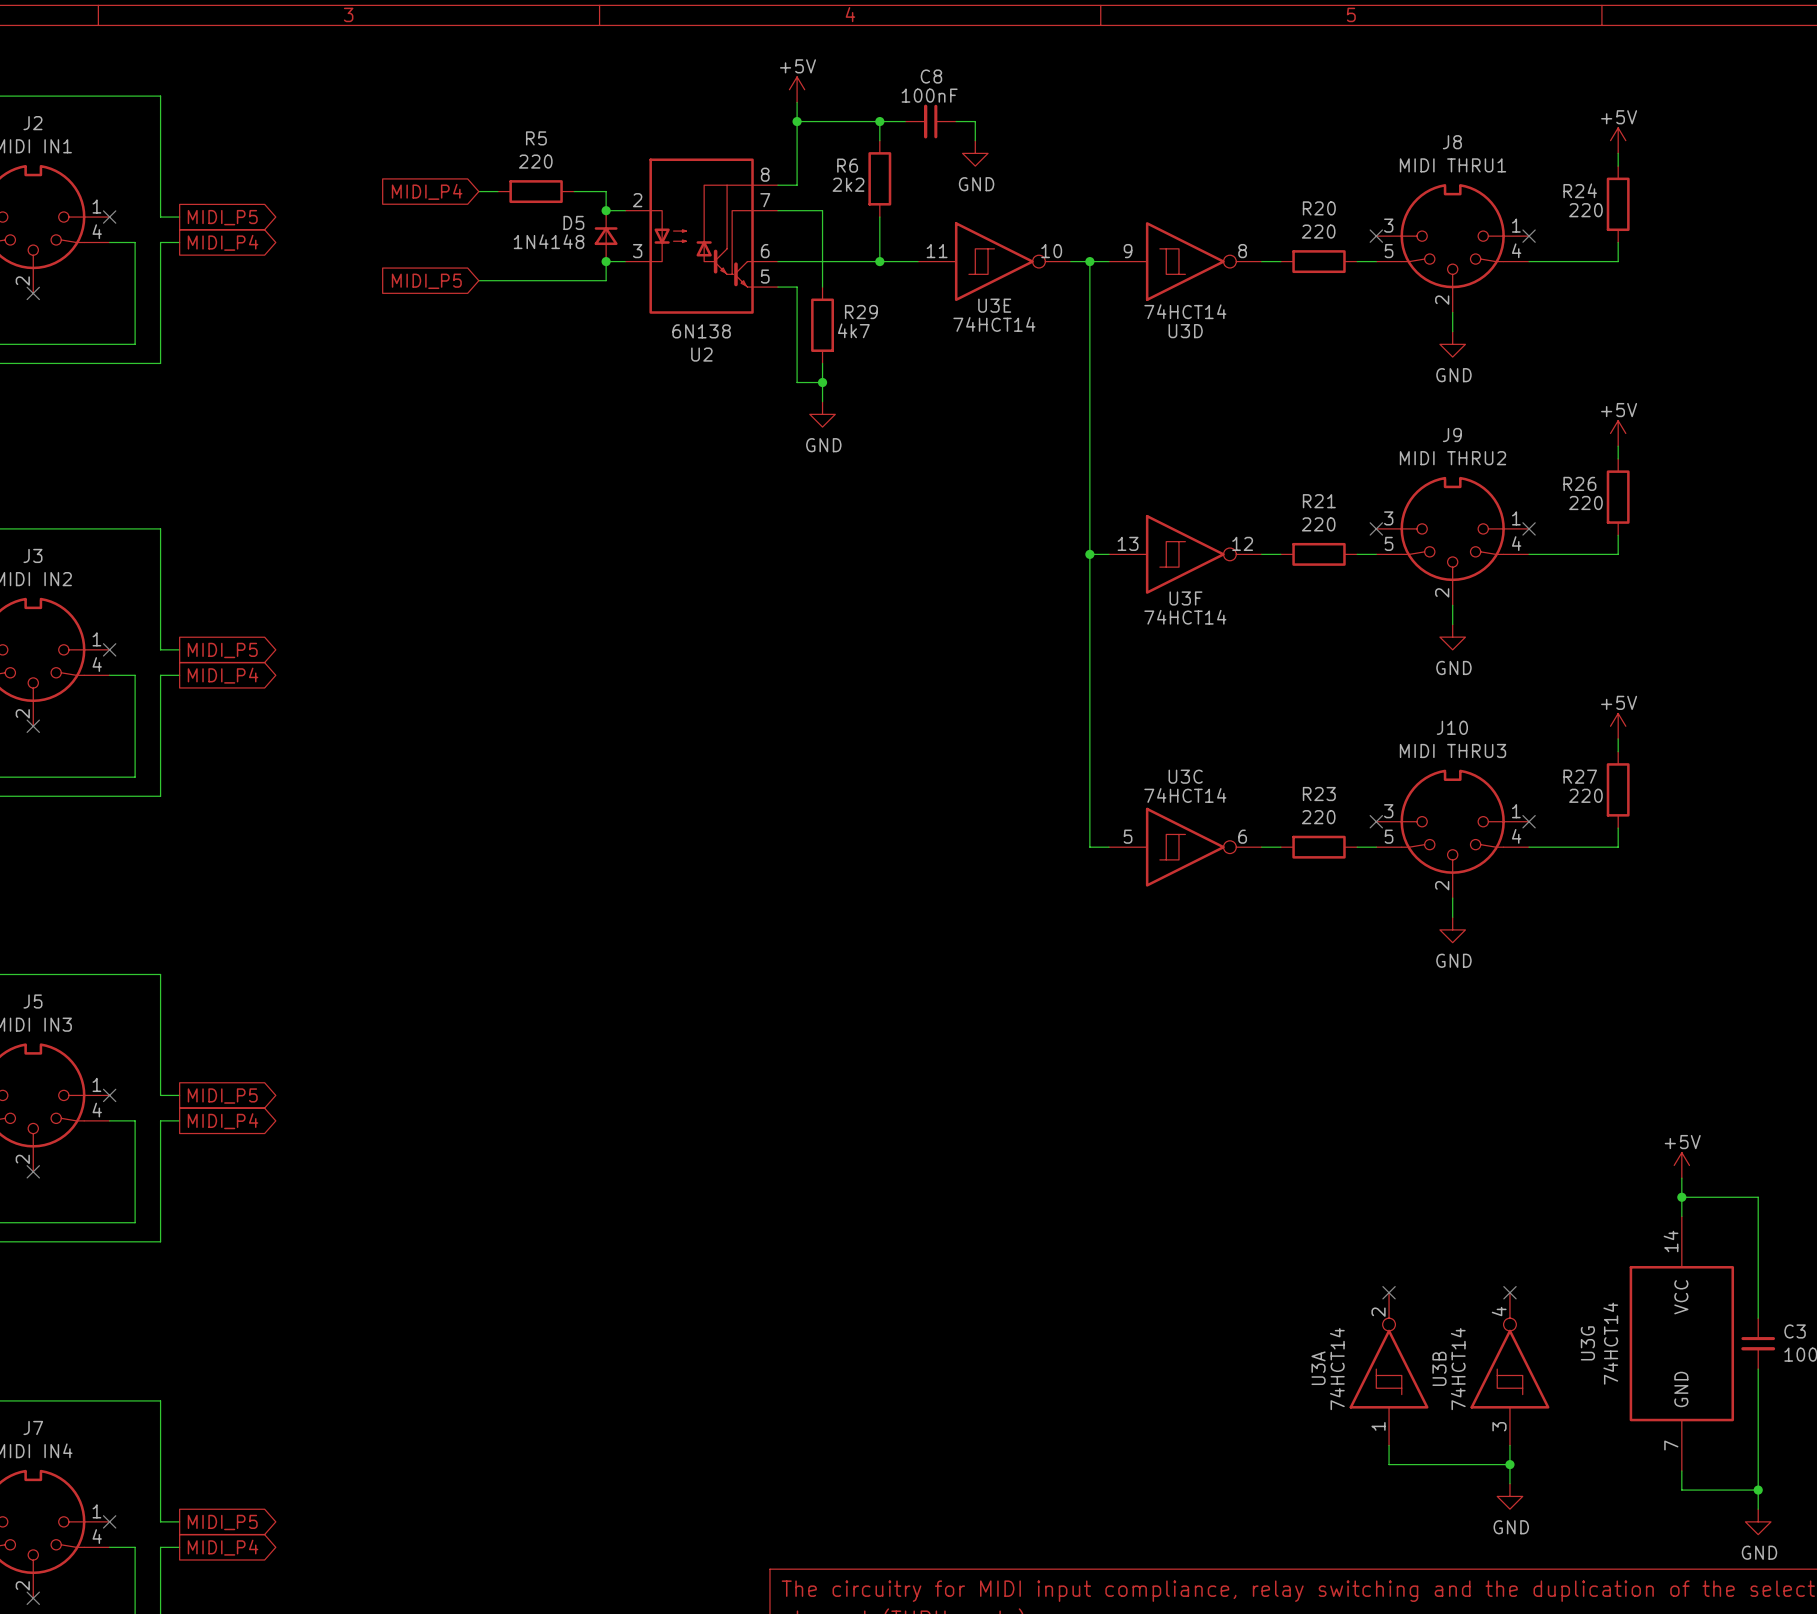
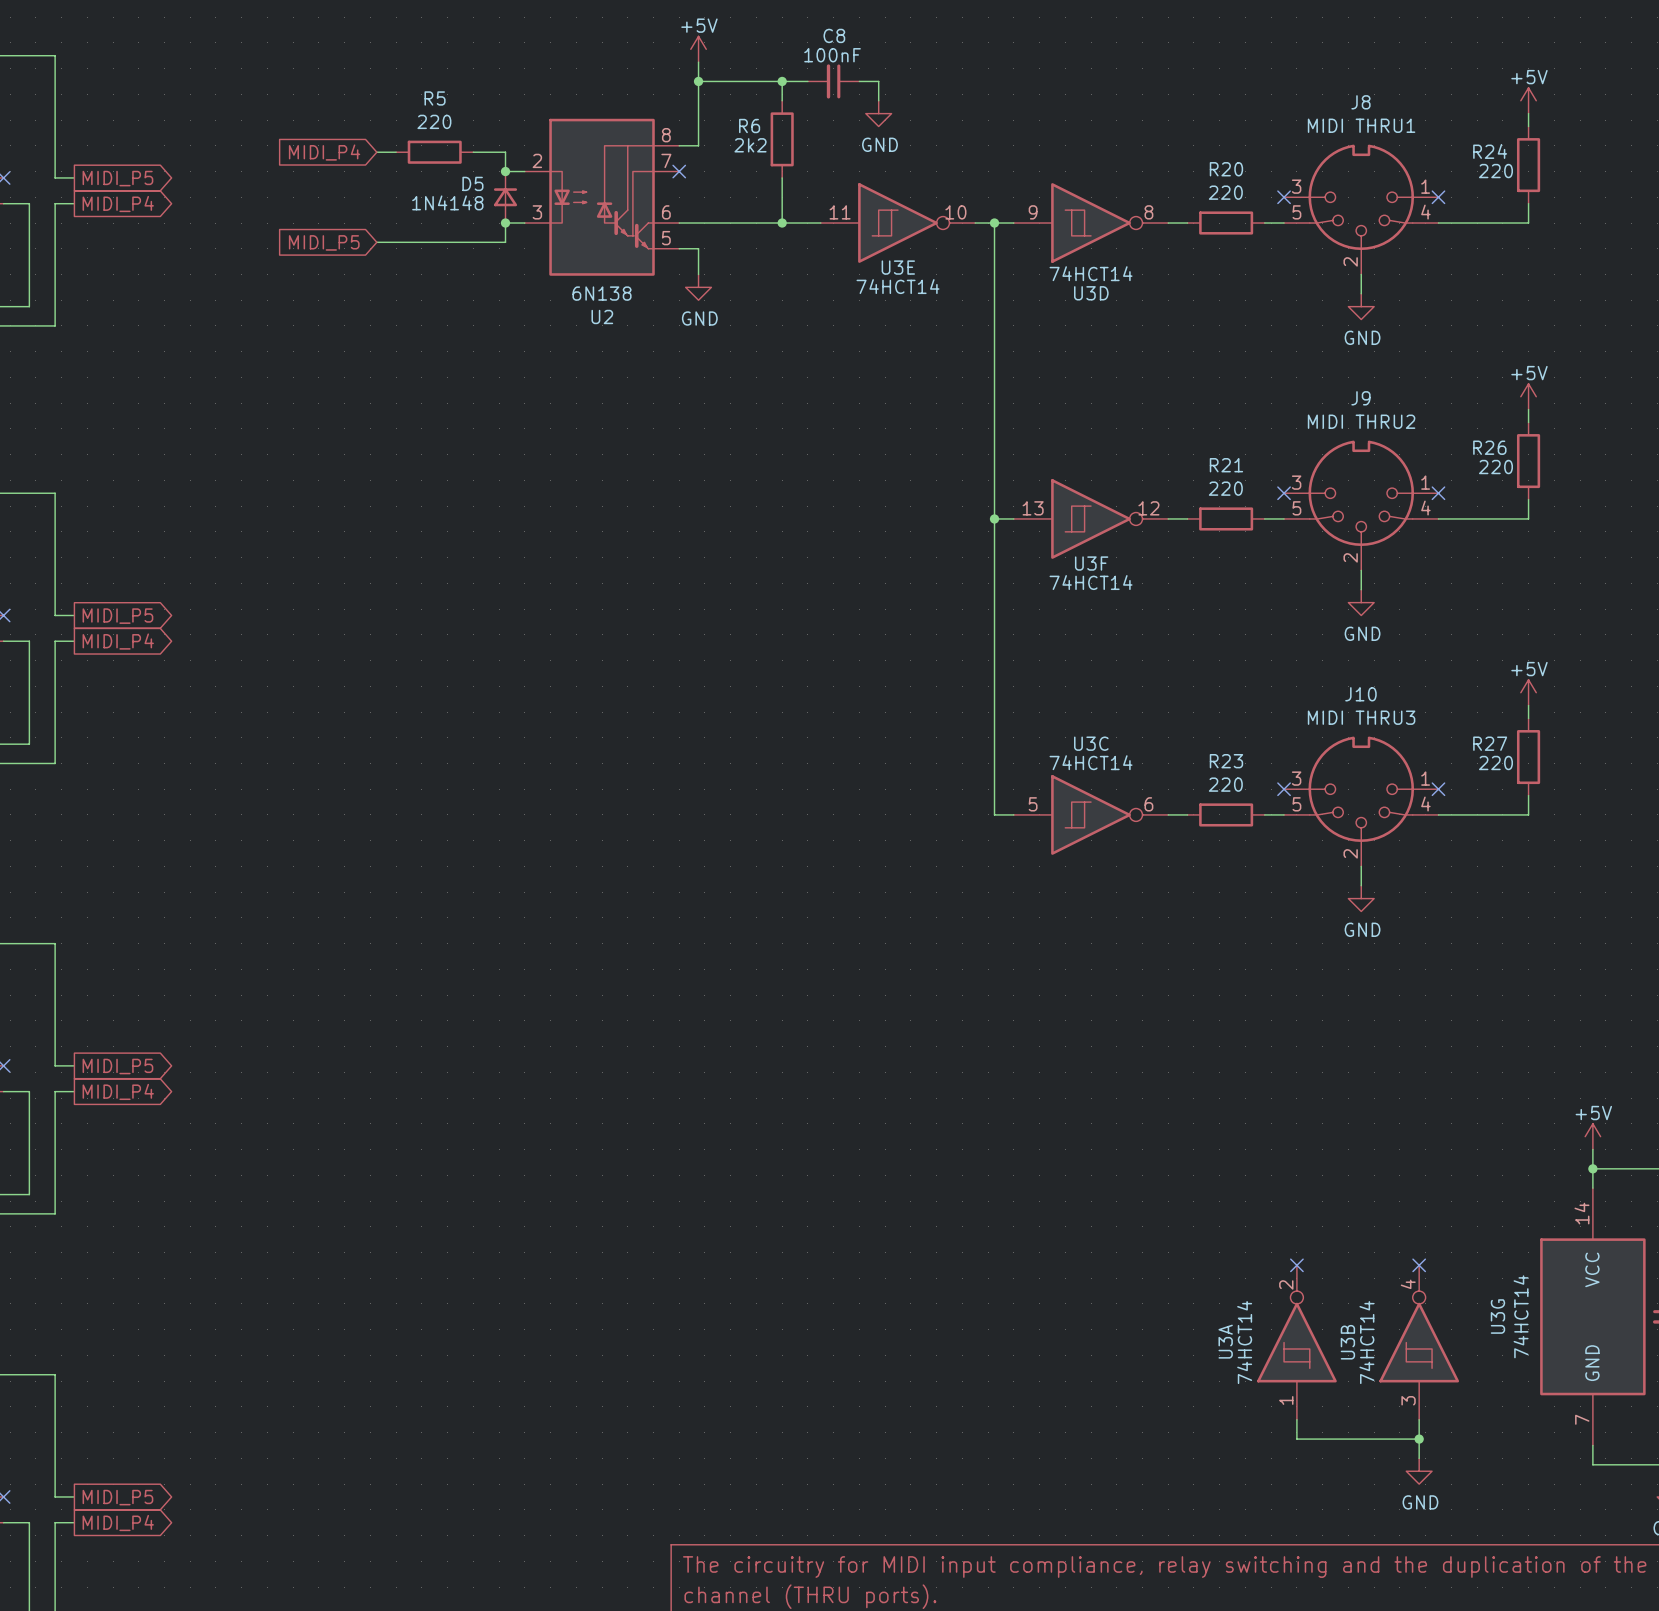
wire: (777, 210) (822, 210) (822, 287) -> none
no-connect mark: none -> (679, 171)
wire: (797, 312) (797, 382) (822, 382) -> none
R29: 4k7 (822, 325) -> none
wire: (822, 363) (822, 401) -> none
junction: (822, 382) -> none
power symbol position: GND (822, 414) -> GND (698, 287)

